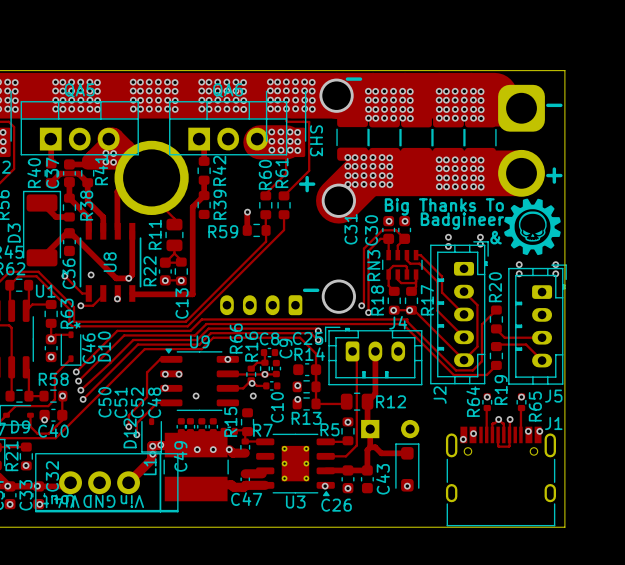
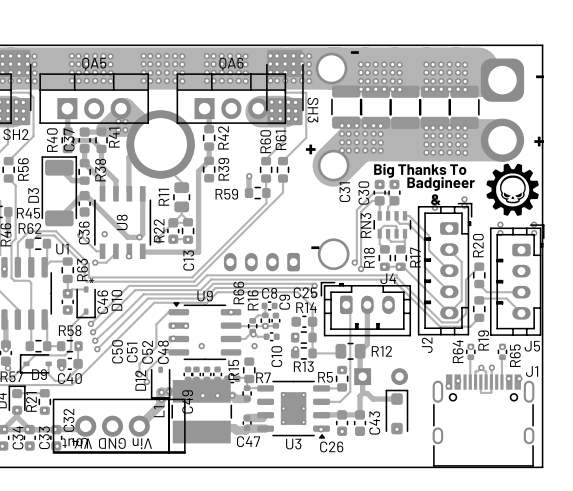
track: none -> (173, 222) (158, 237) (158, 240)
via: none -> (158, 240)

